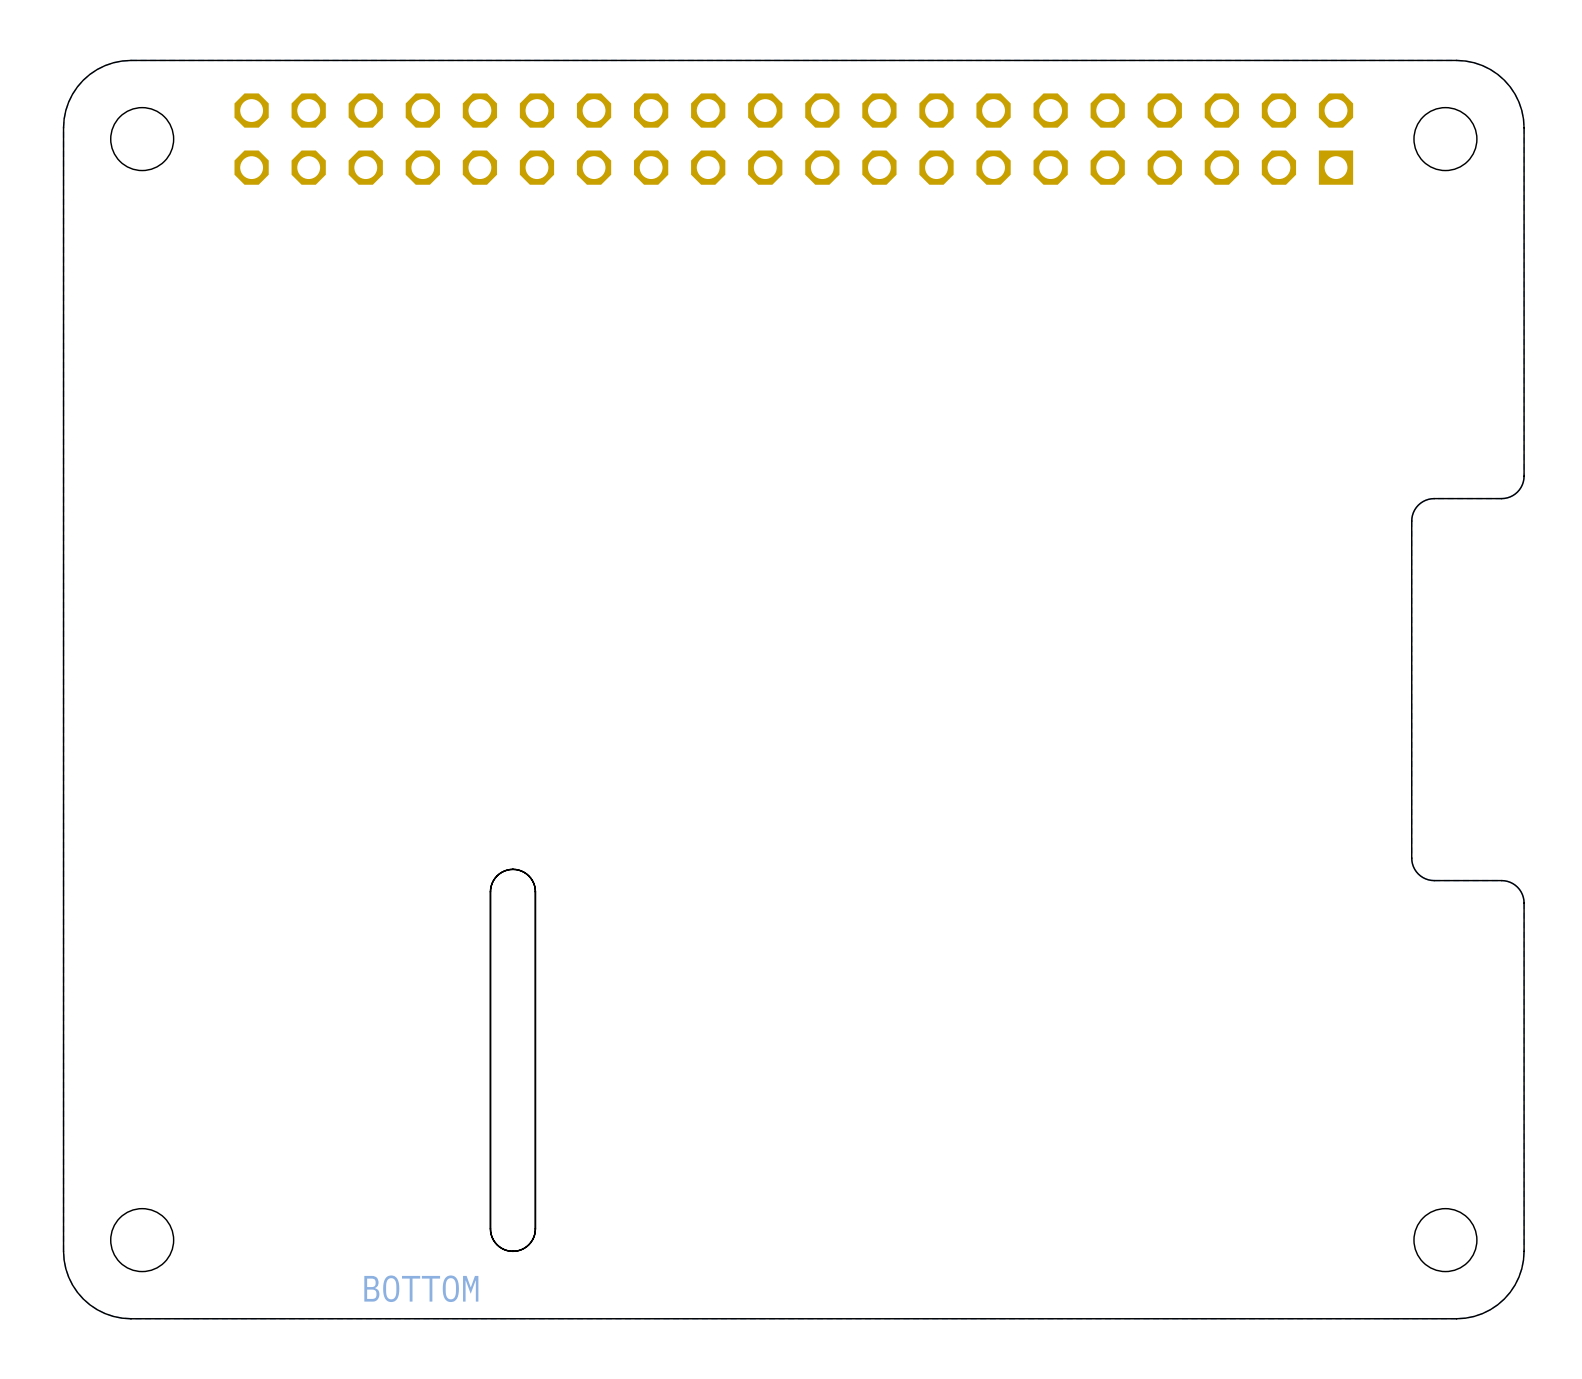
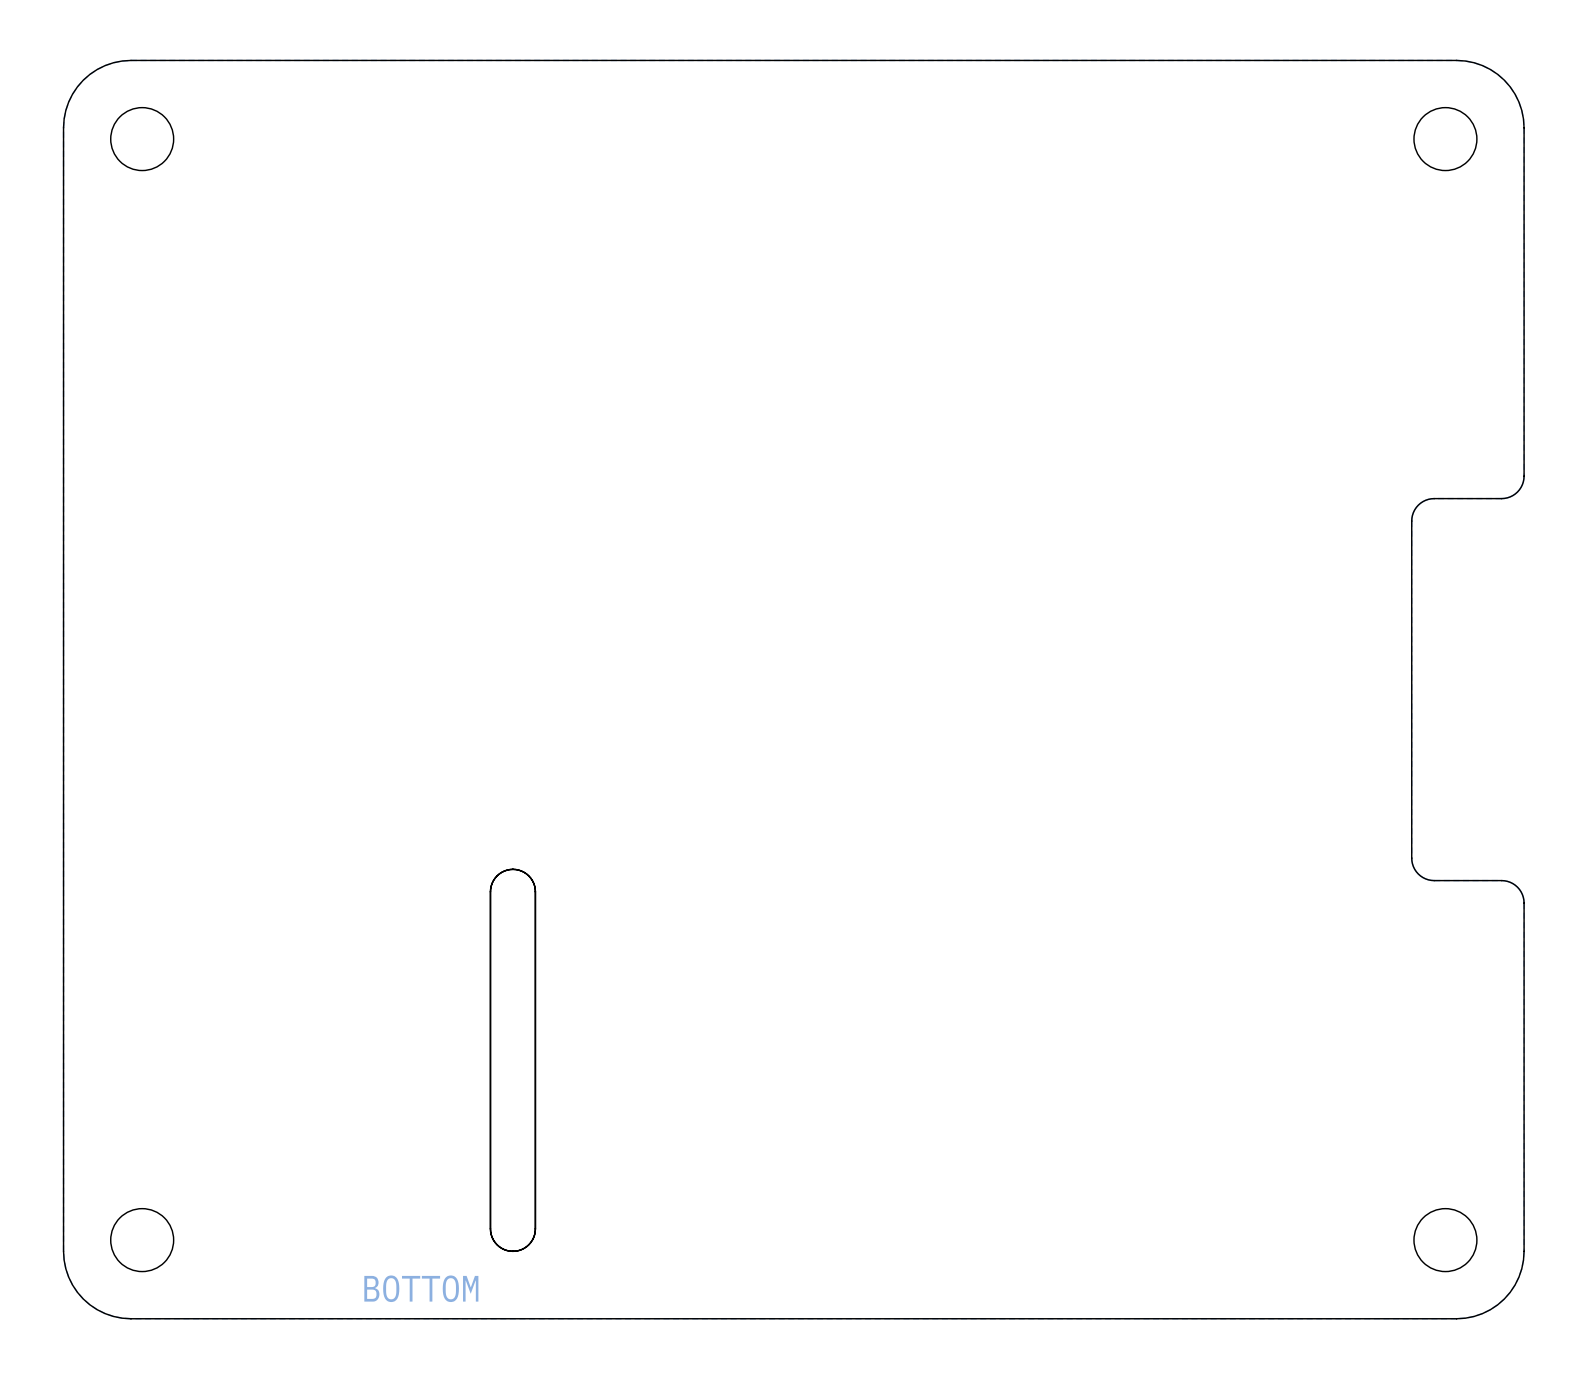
part: (793, 139) -> none

